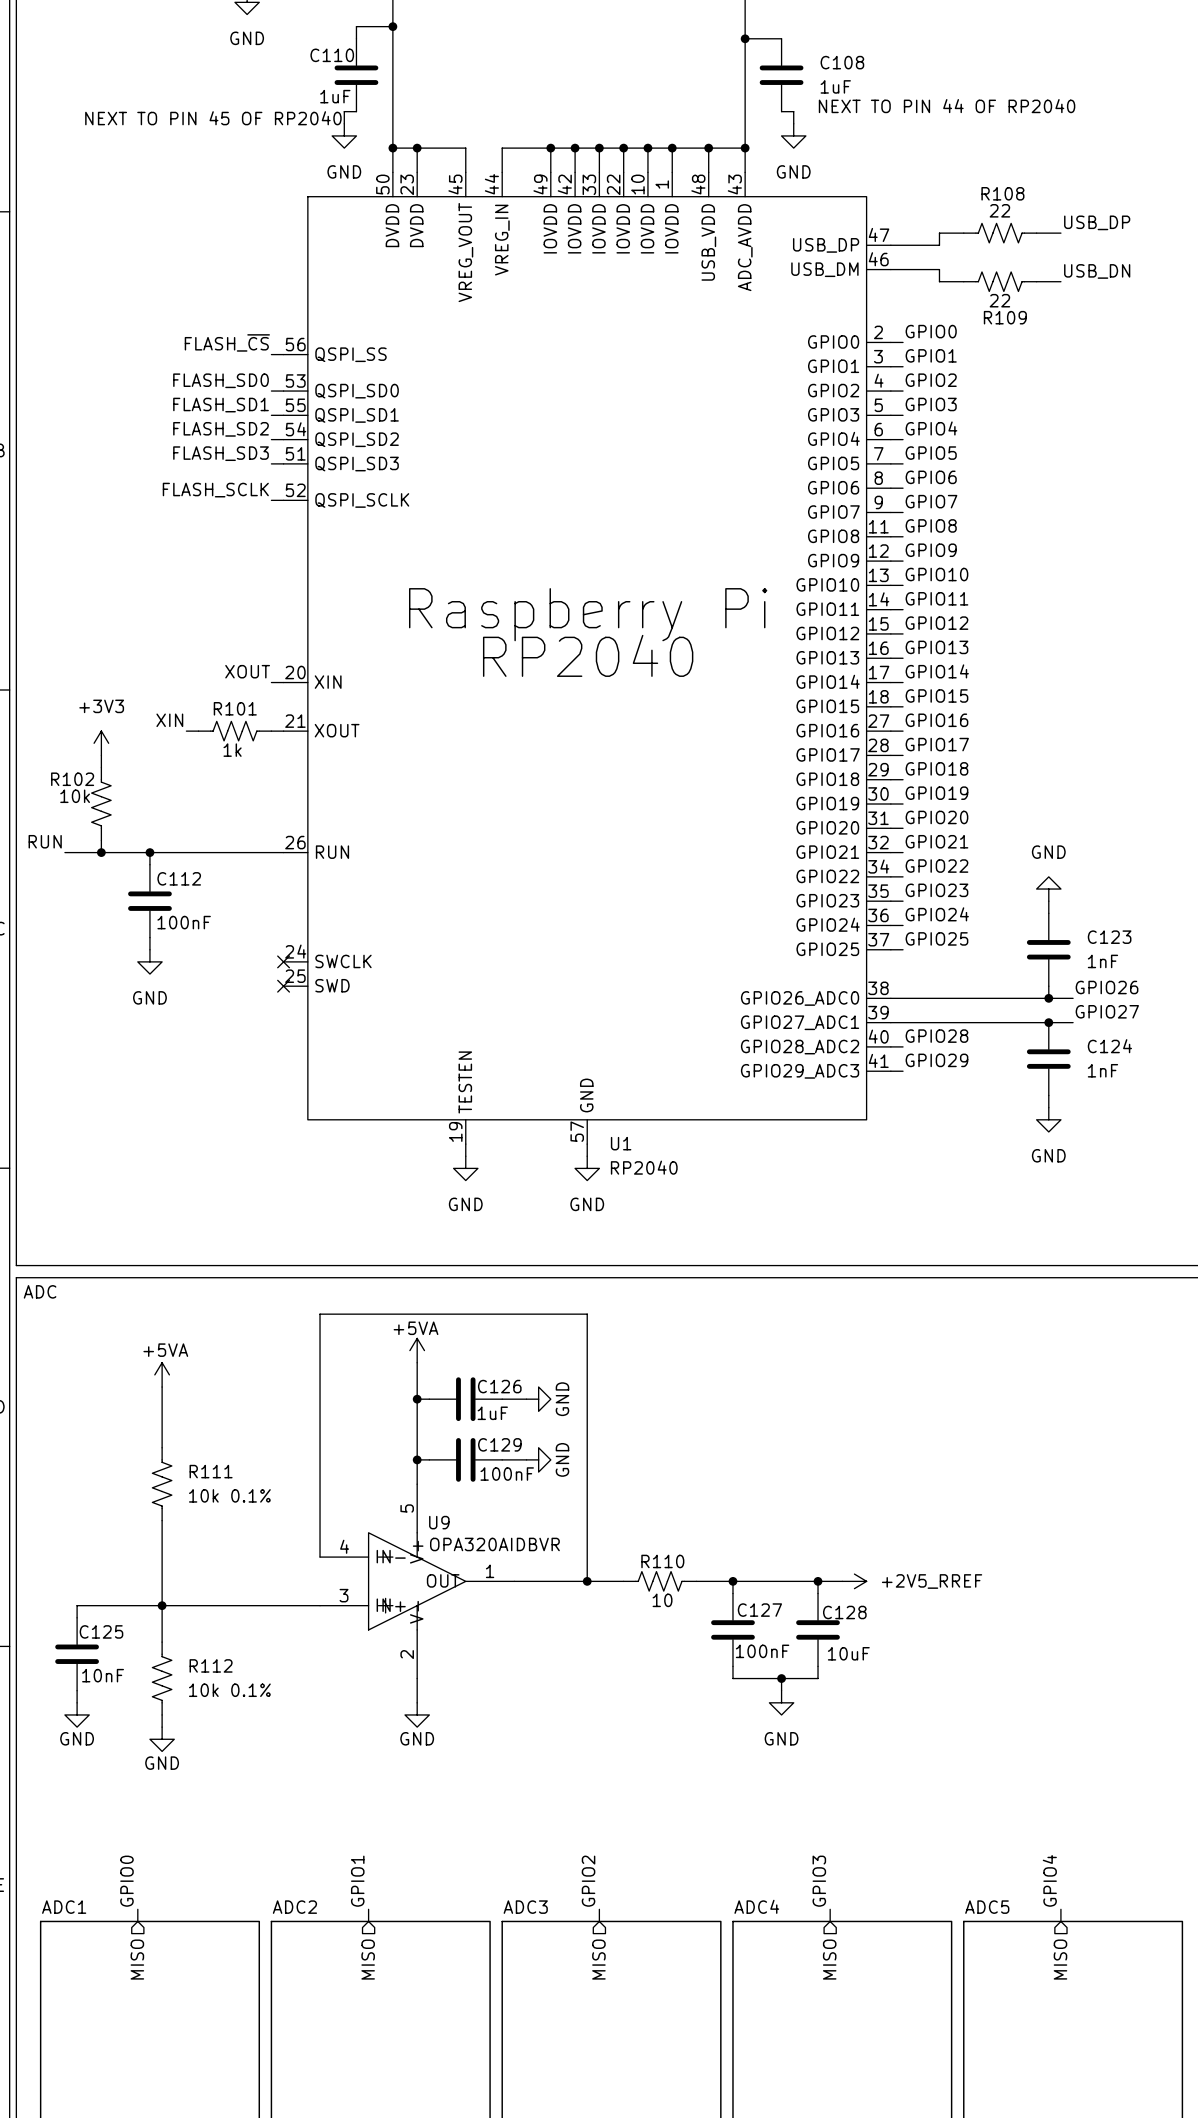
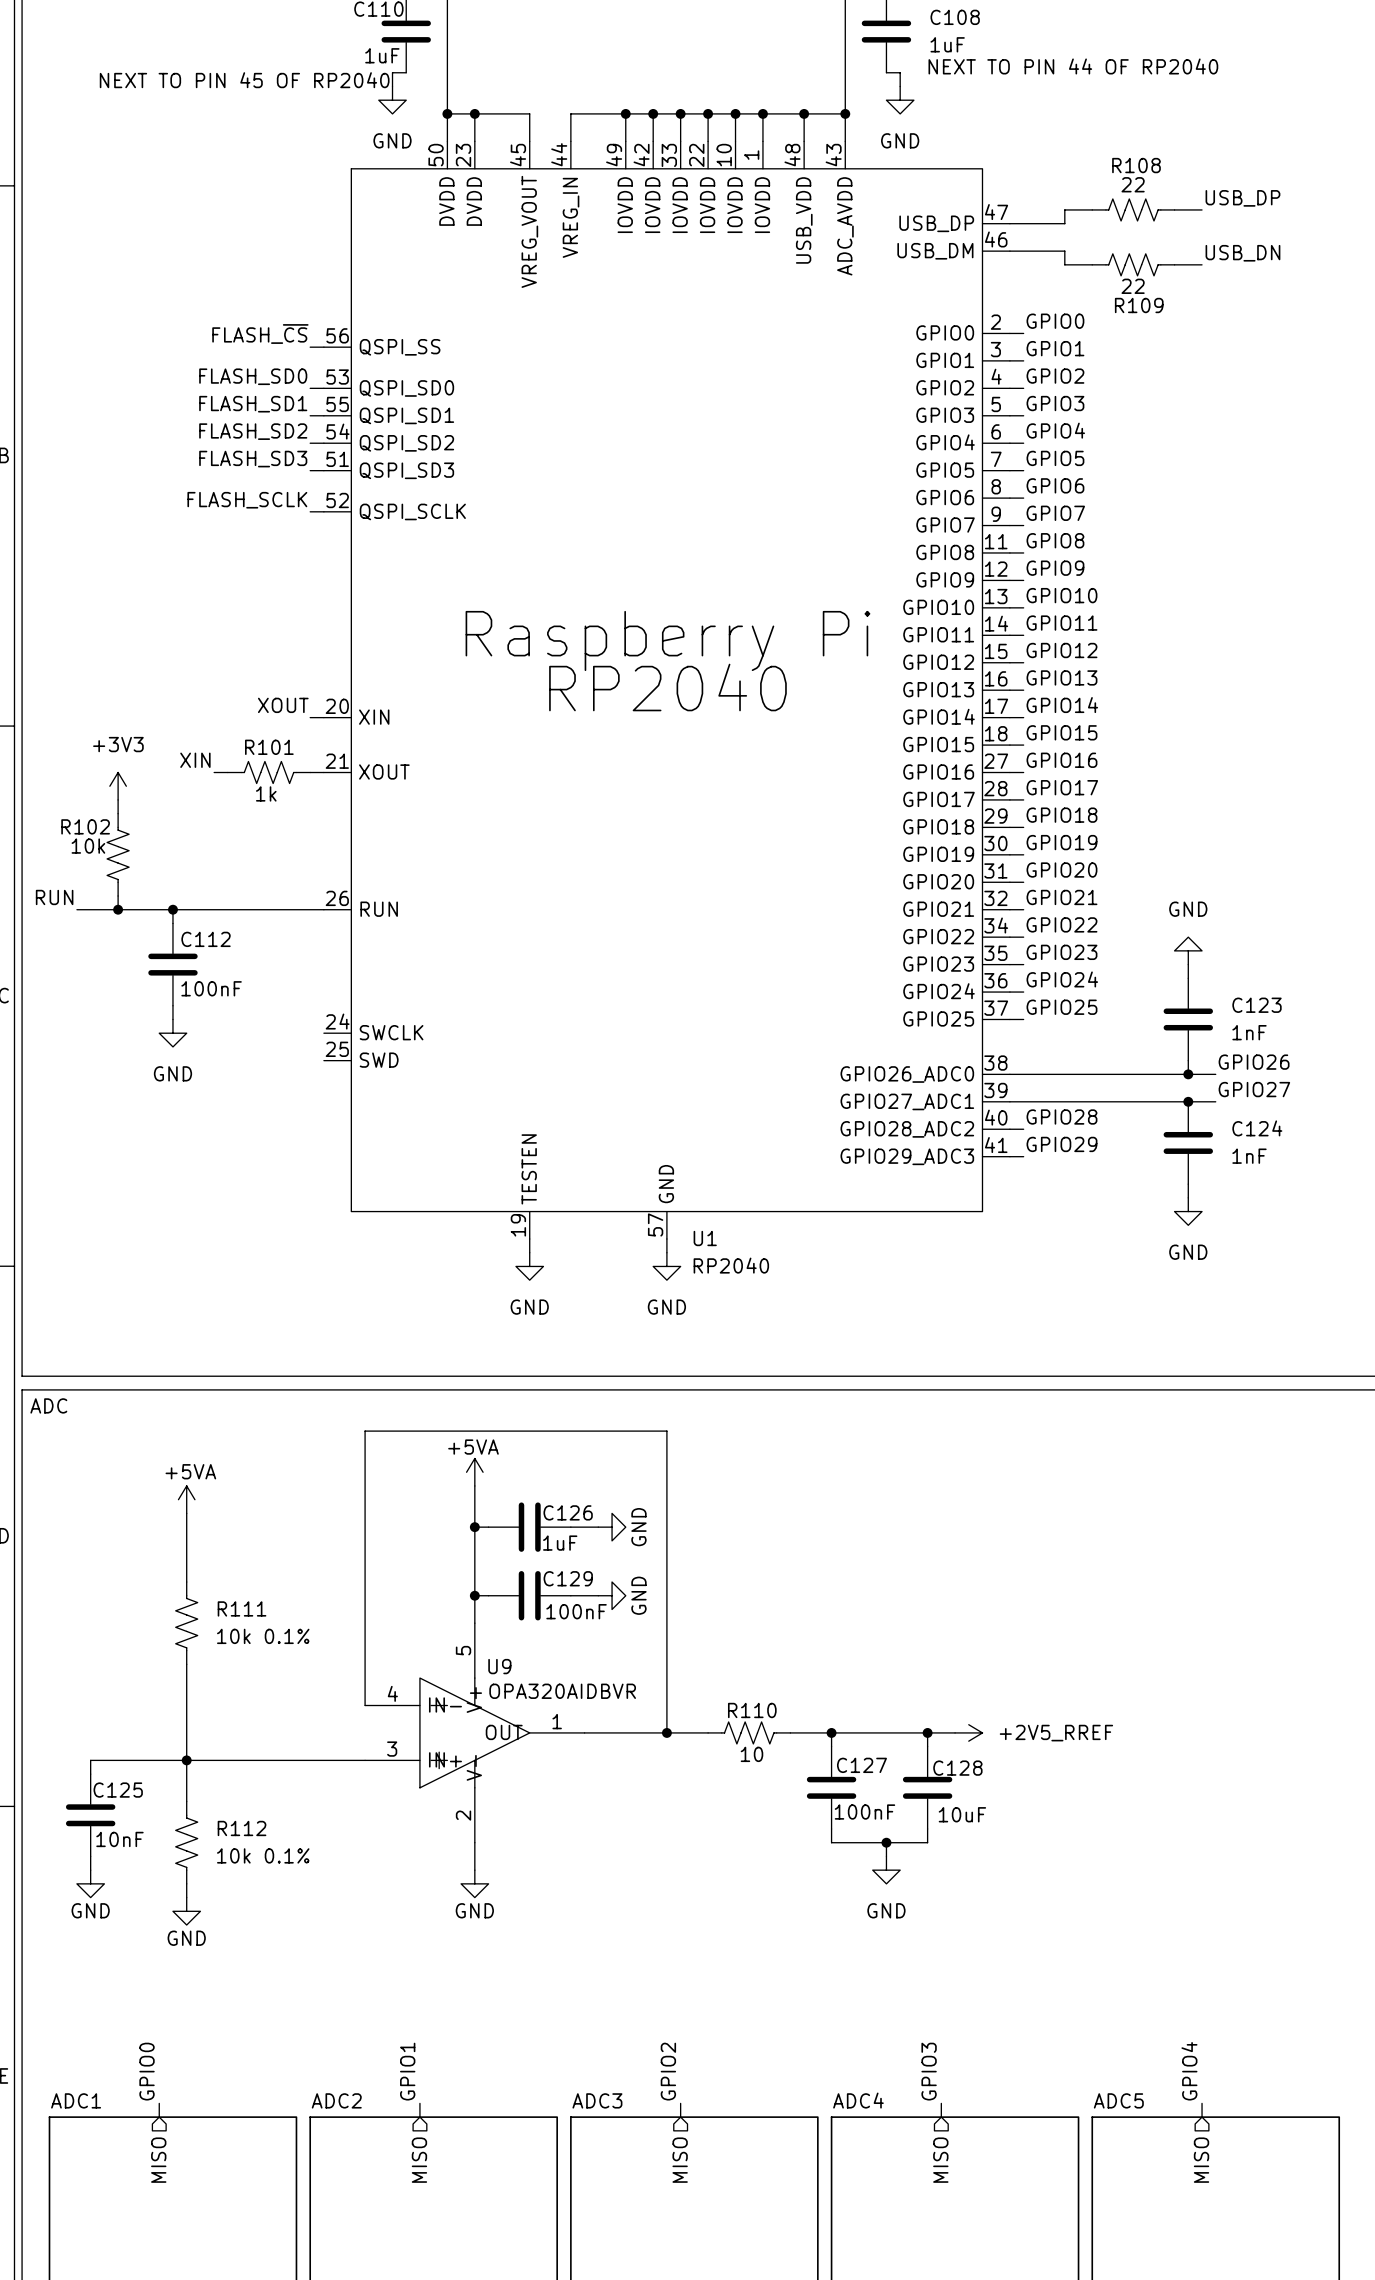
no-connect mark: (283, 961) -> none
no-connect mark: (283, 986) -> none

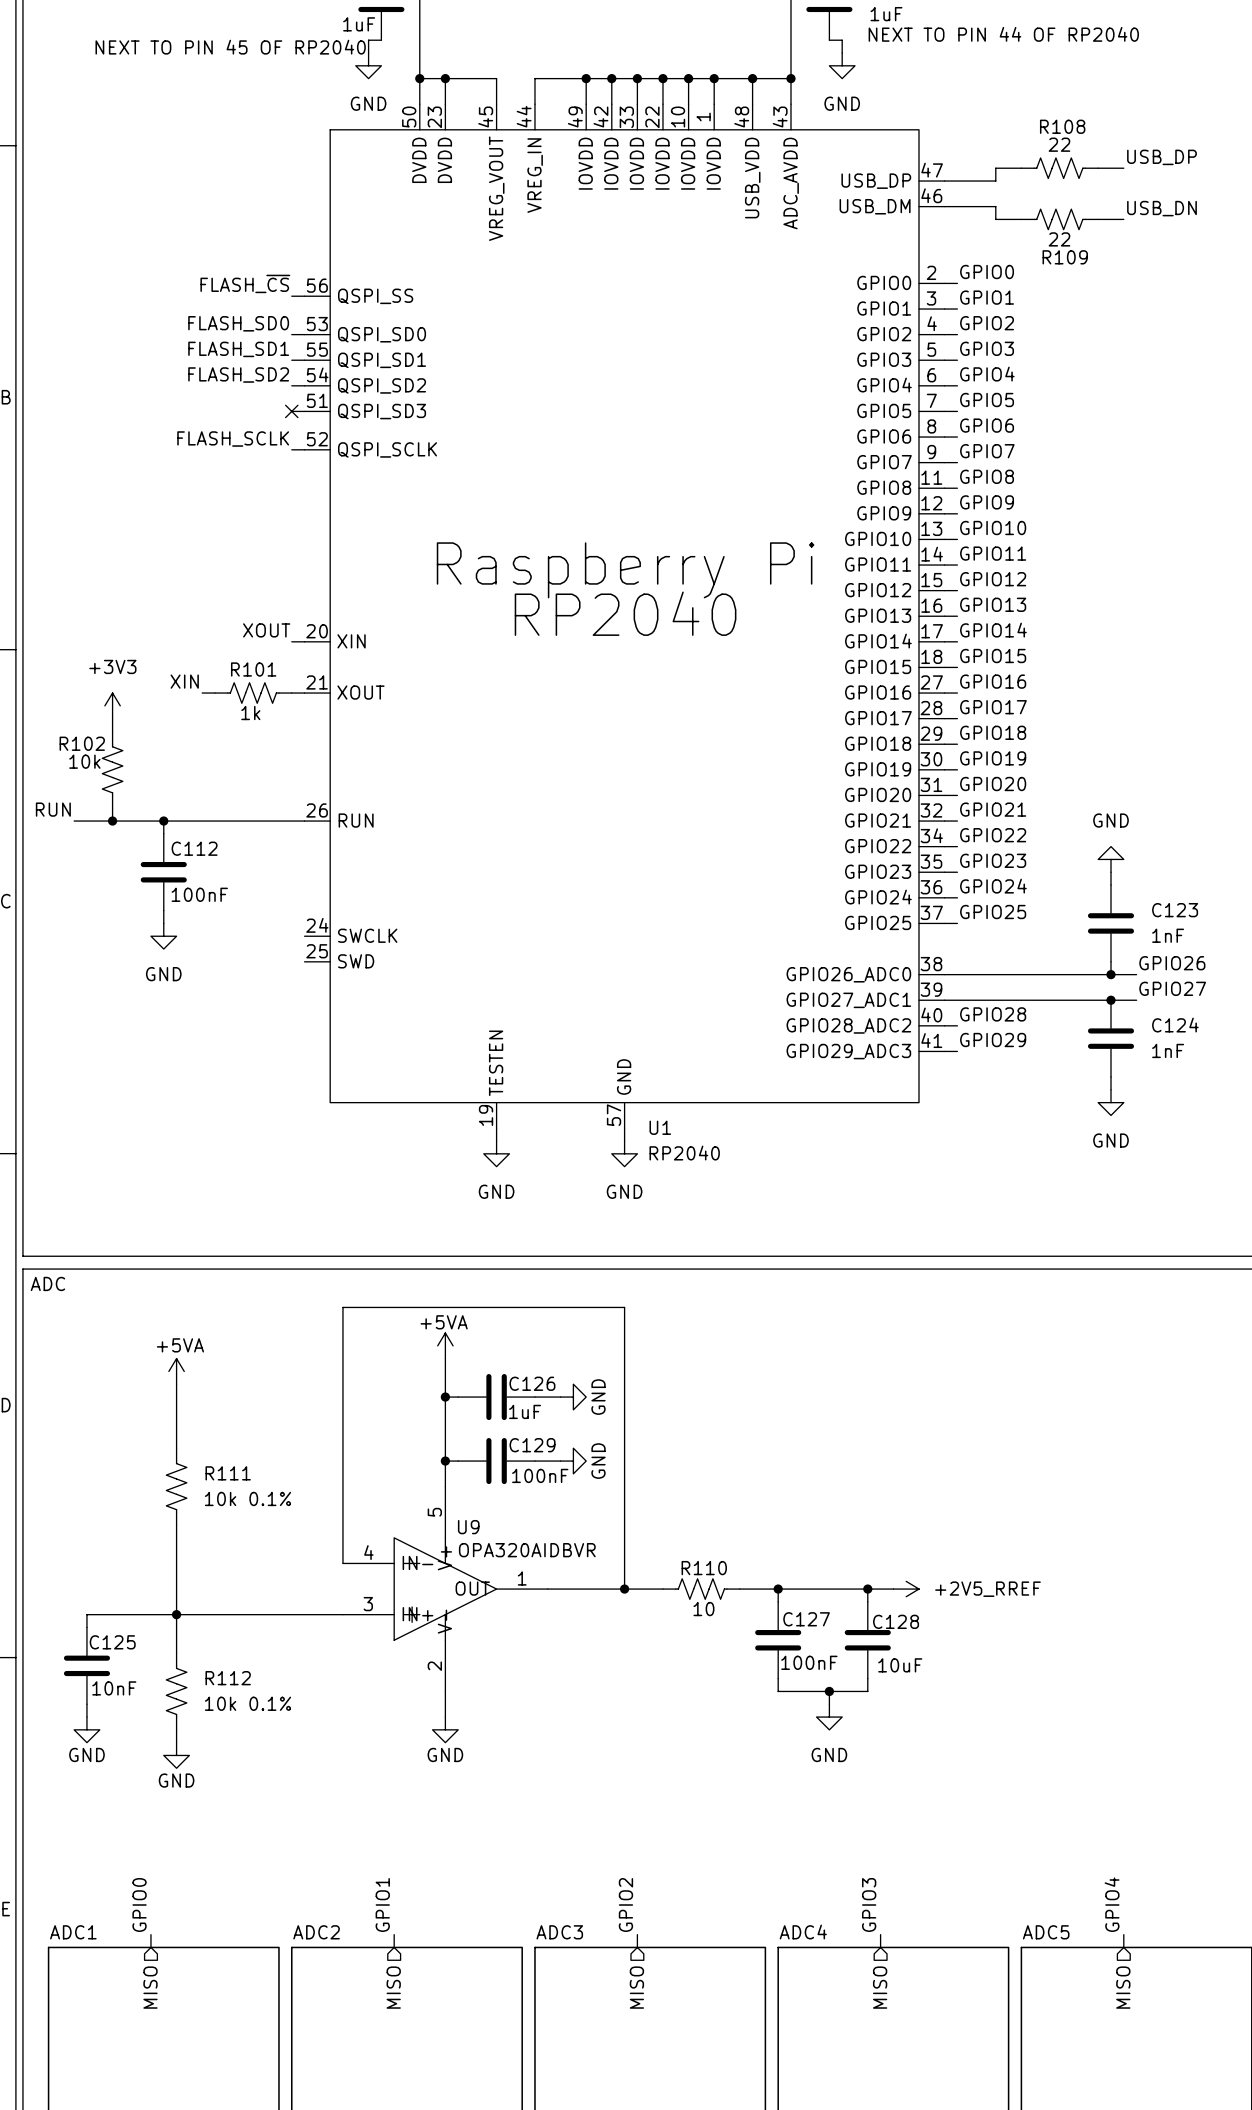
label: FLASH_SD3 (253, 459) -> none
no-connect mark: none -> (291, 411)

